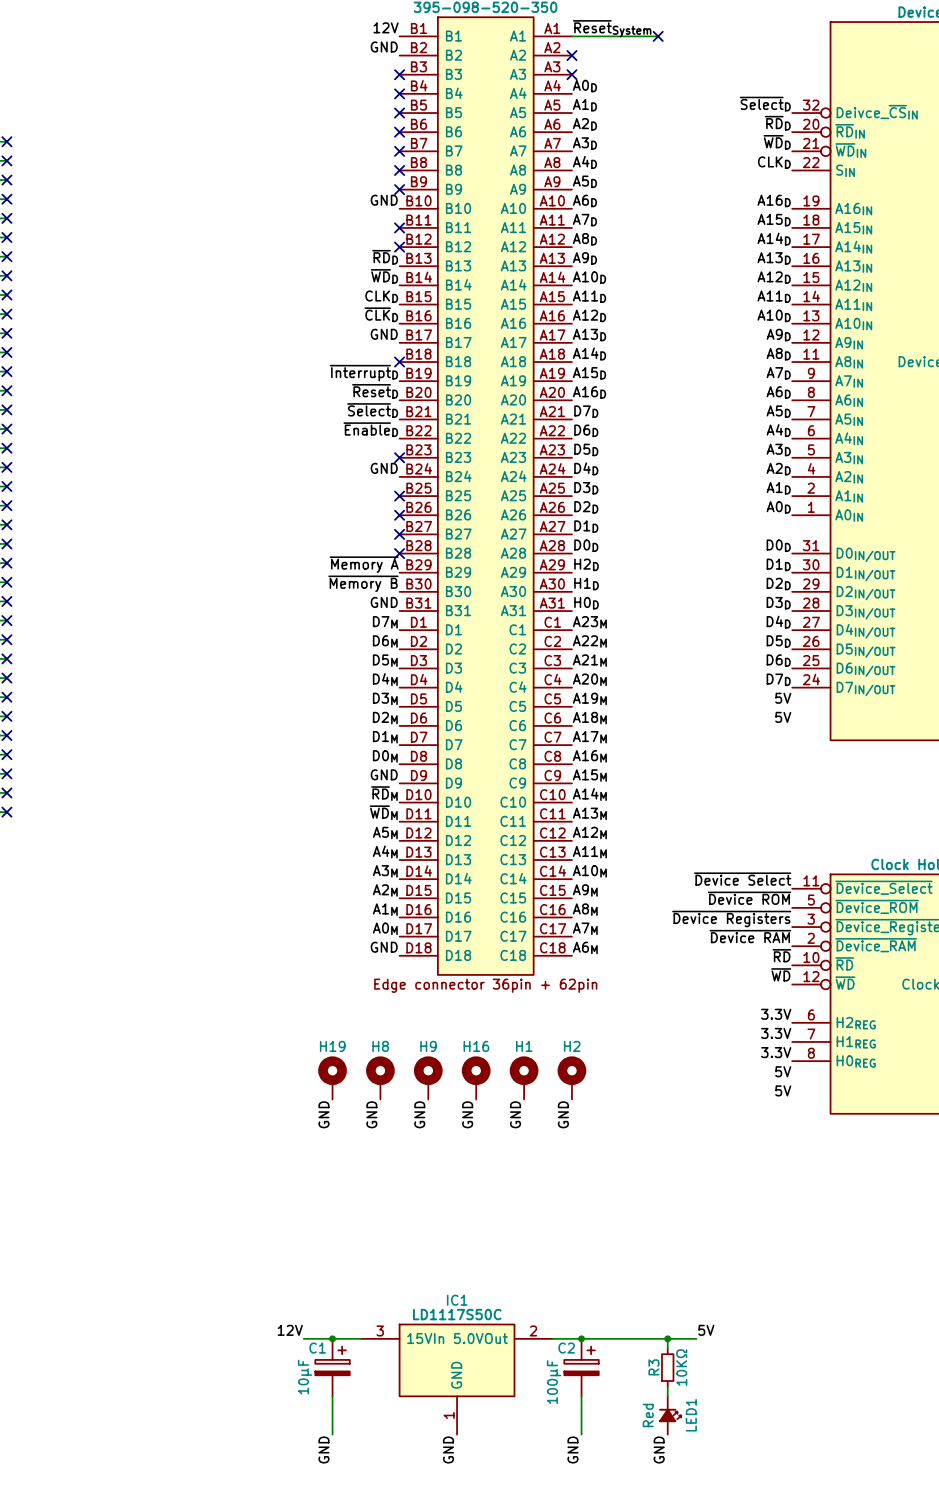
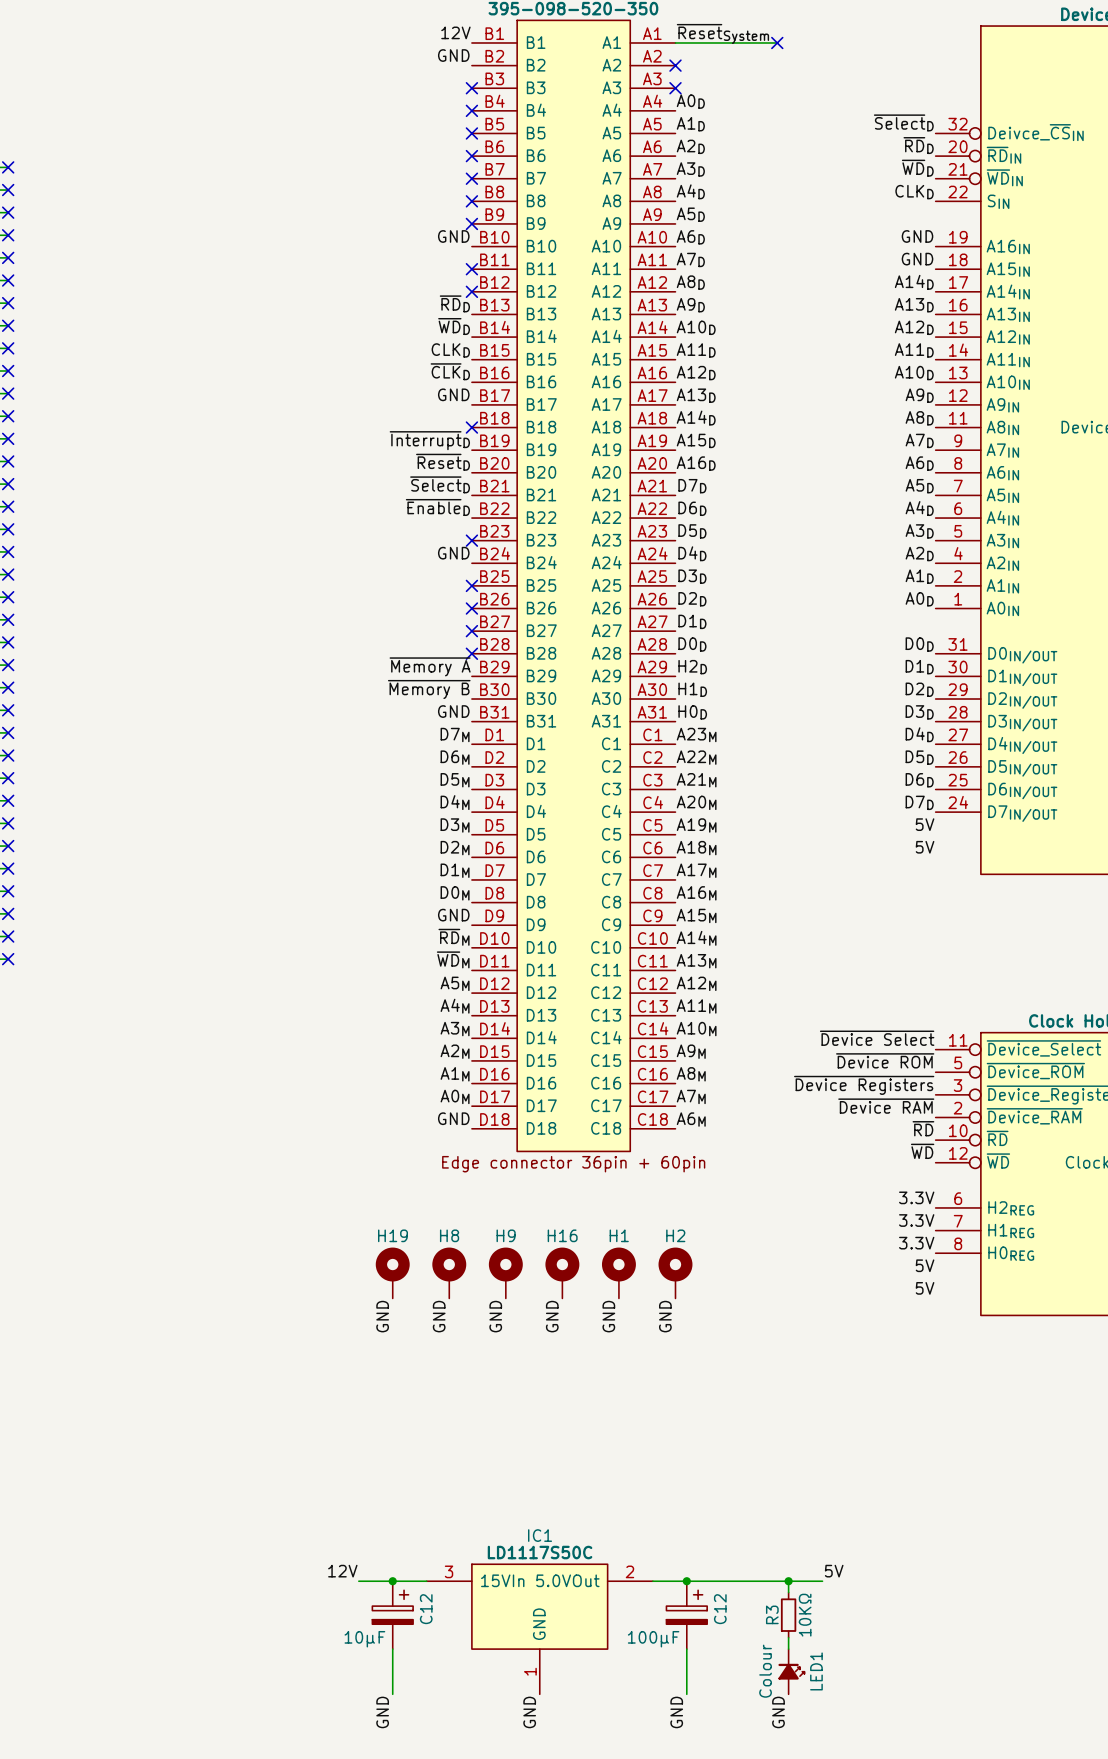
label: A16D (774, 200) -> GND (917, 236)
label: A15D (774, 220) -> GND (917, 259)
part text: Edge connector 36pin + 62pin (485, 985) -> Edge connector 36pin + 60pin (573, 1164)
C1 name: C1 (317, 1348) -> C12 (426, 1609)
C2 name: C2 (566, 1348) -> C12 (720, 1609)
C1 value: 10μF (305, 1377) -> none
C2 value: 100μF (554, 1382) -> none
C1 text: none -> 10μF (364, 1639)
C2 text: none -> 100μF (653, 1639)
LED1 text: none -> Colour (765, 1671)
LED1 value: Red (648, 1415) -> none

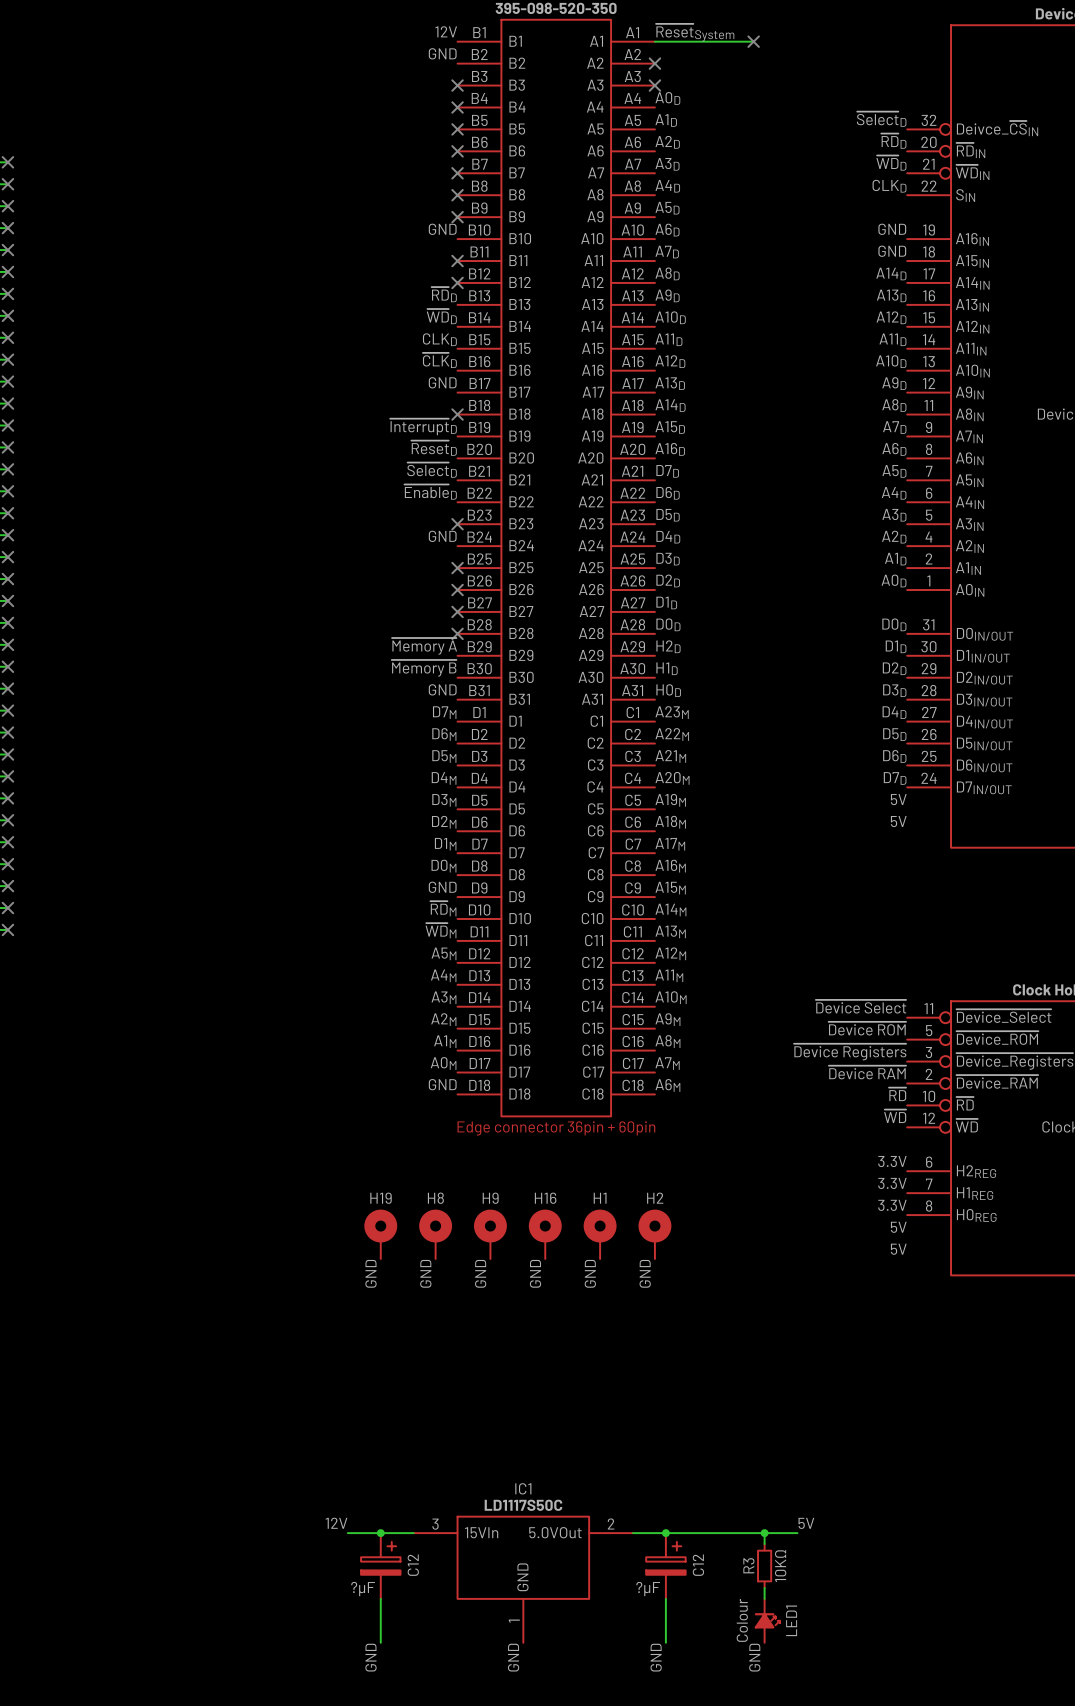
C12 text: 10μF (364, 1639) -> ?μF (363, 1589)
C12 text: 100μF (653, 1639) -> ?μF (648, 1589)

